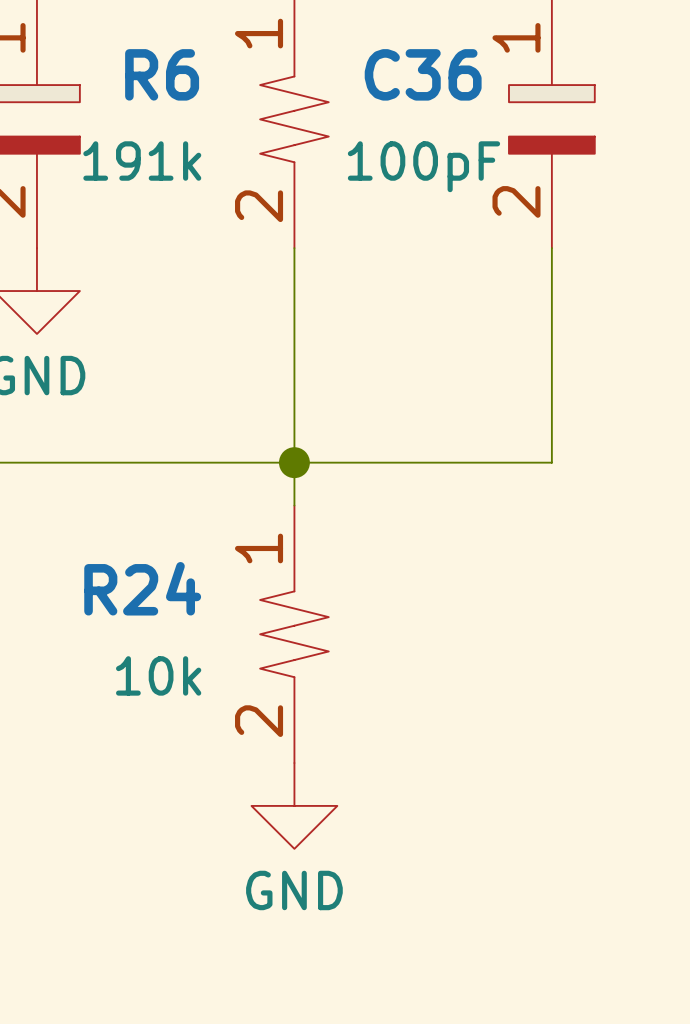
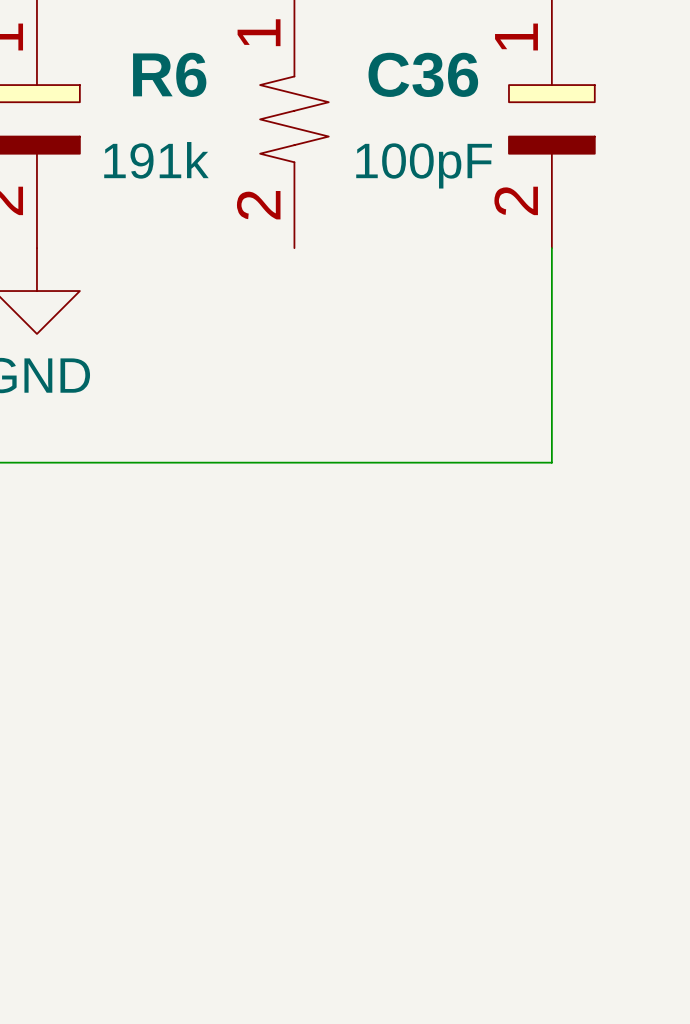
wire: (294, 248) (294, 505) -> none
junction: (294, 462) -> none
R24: 10k (294, 634) -> none
power symbol: GND (294, 805) -> none

